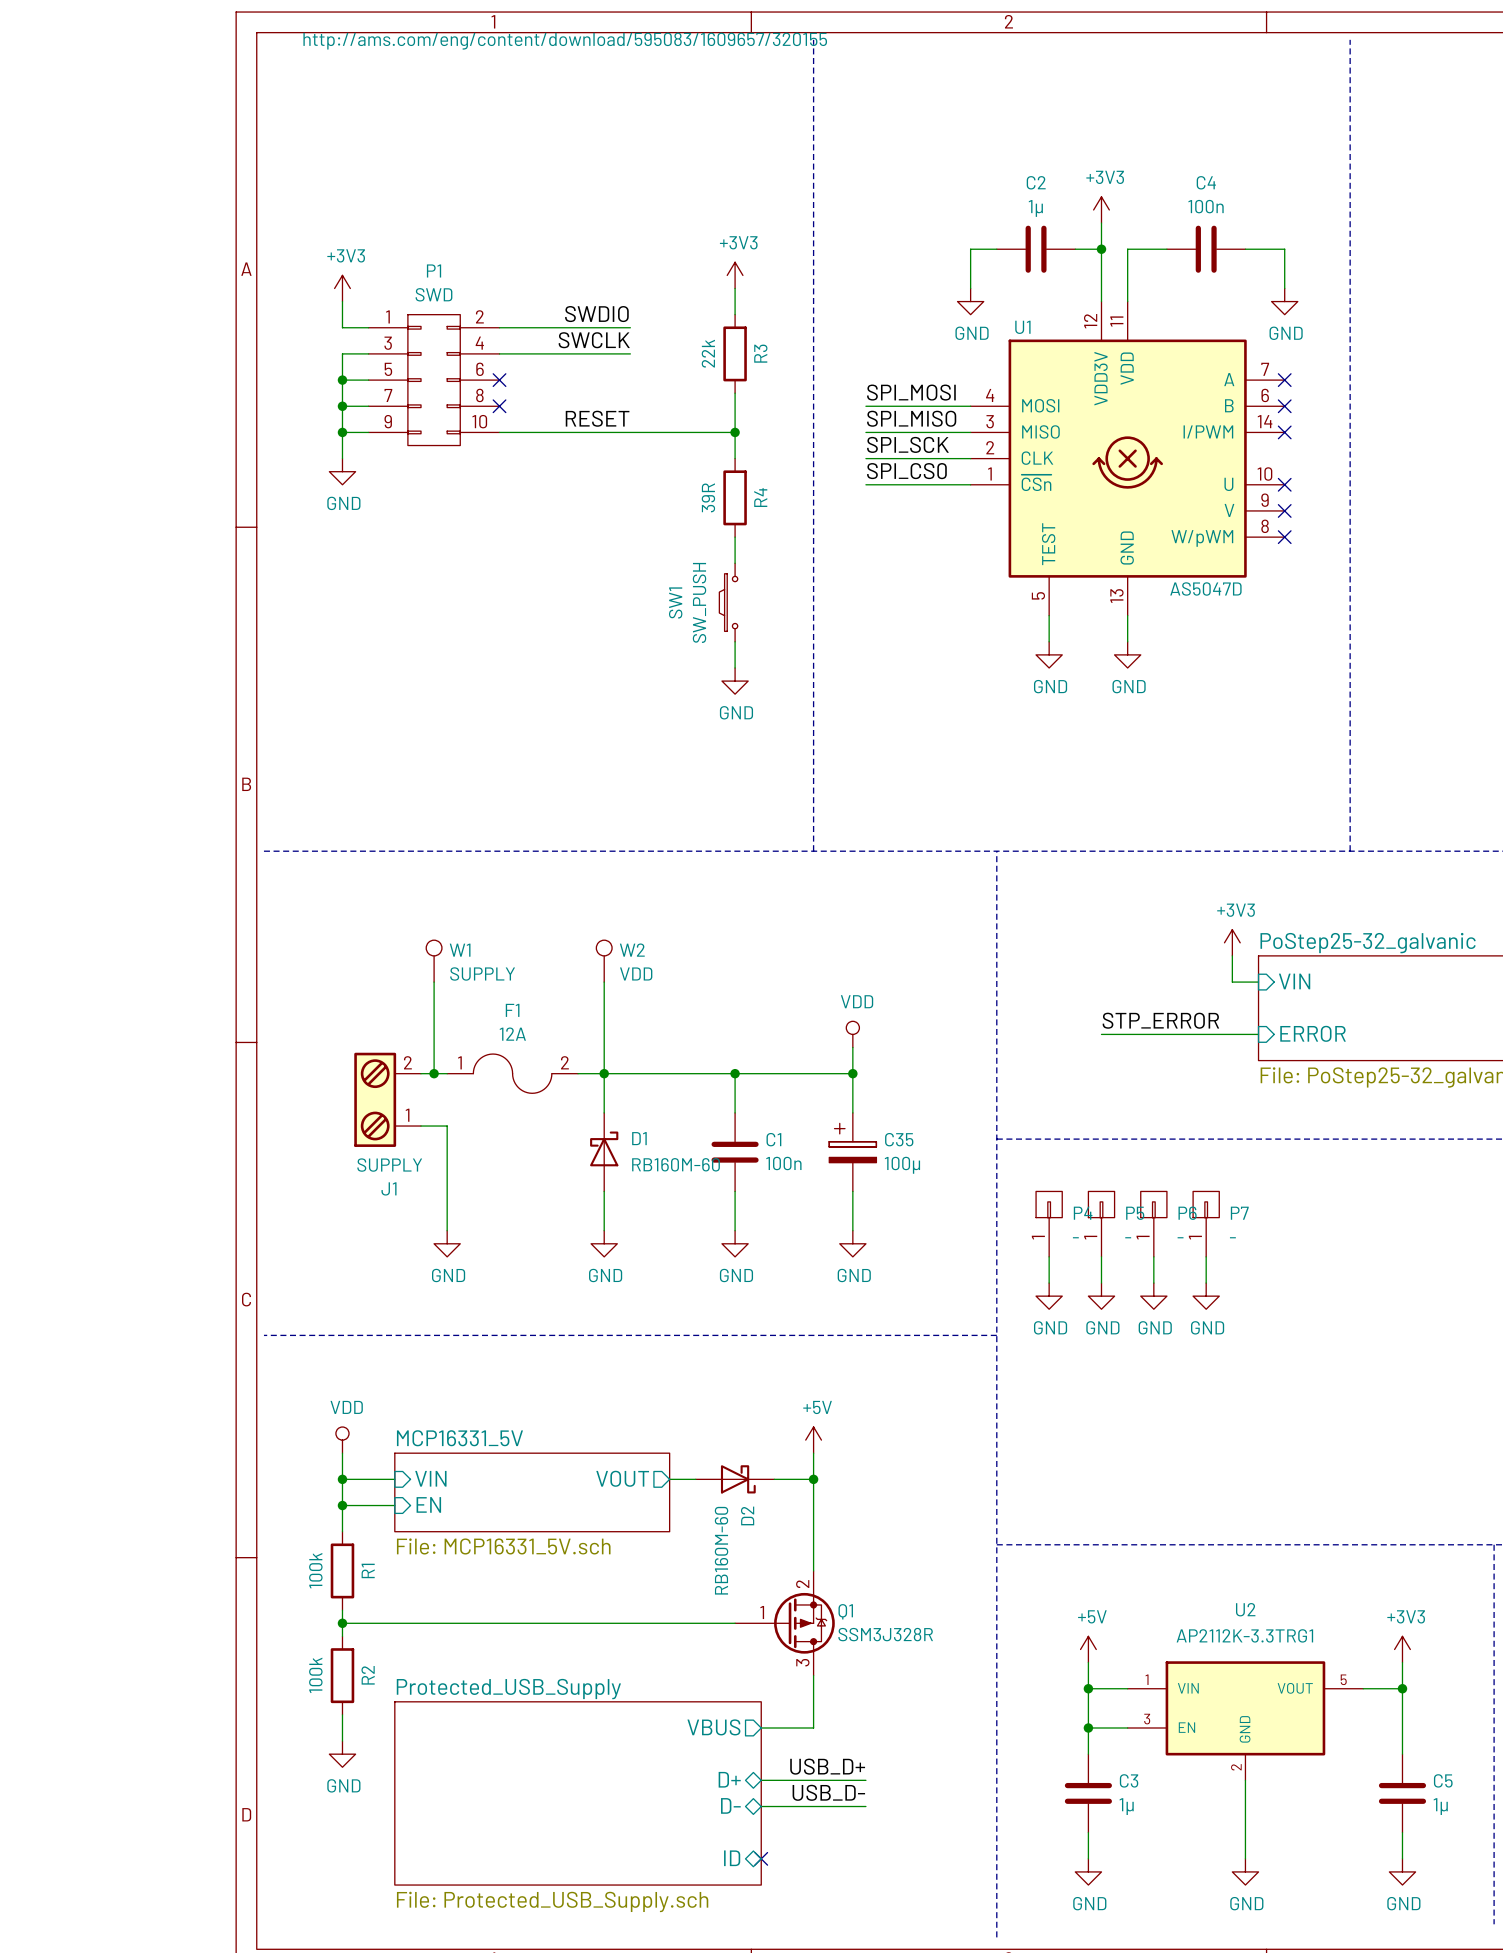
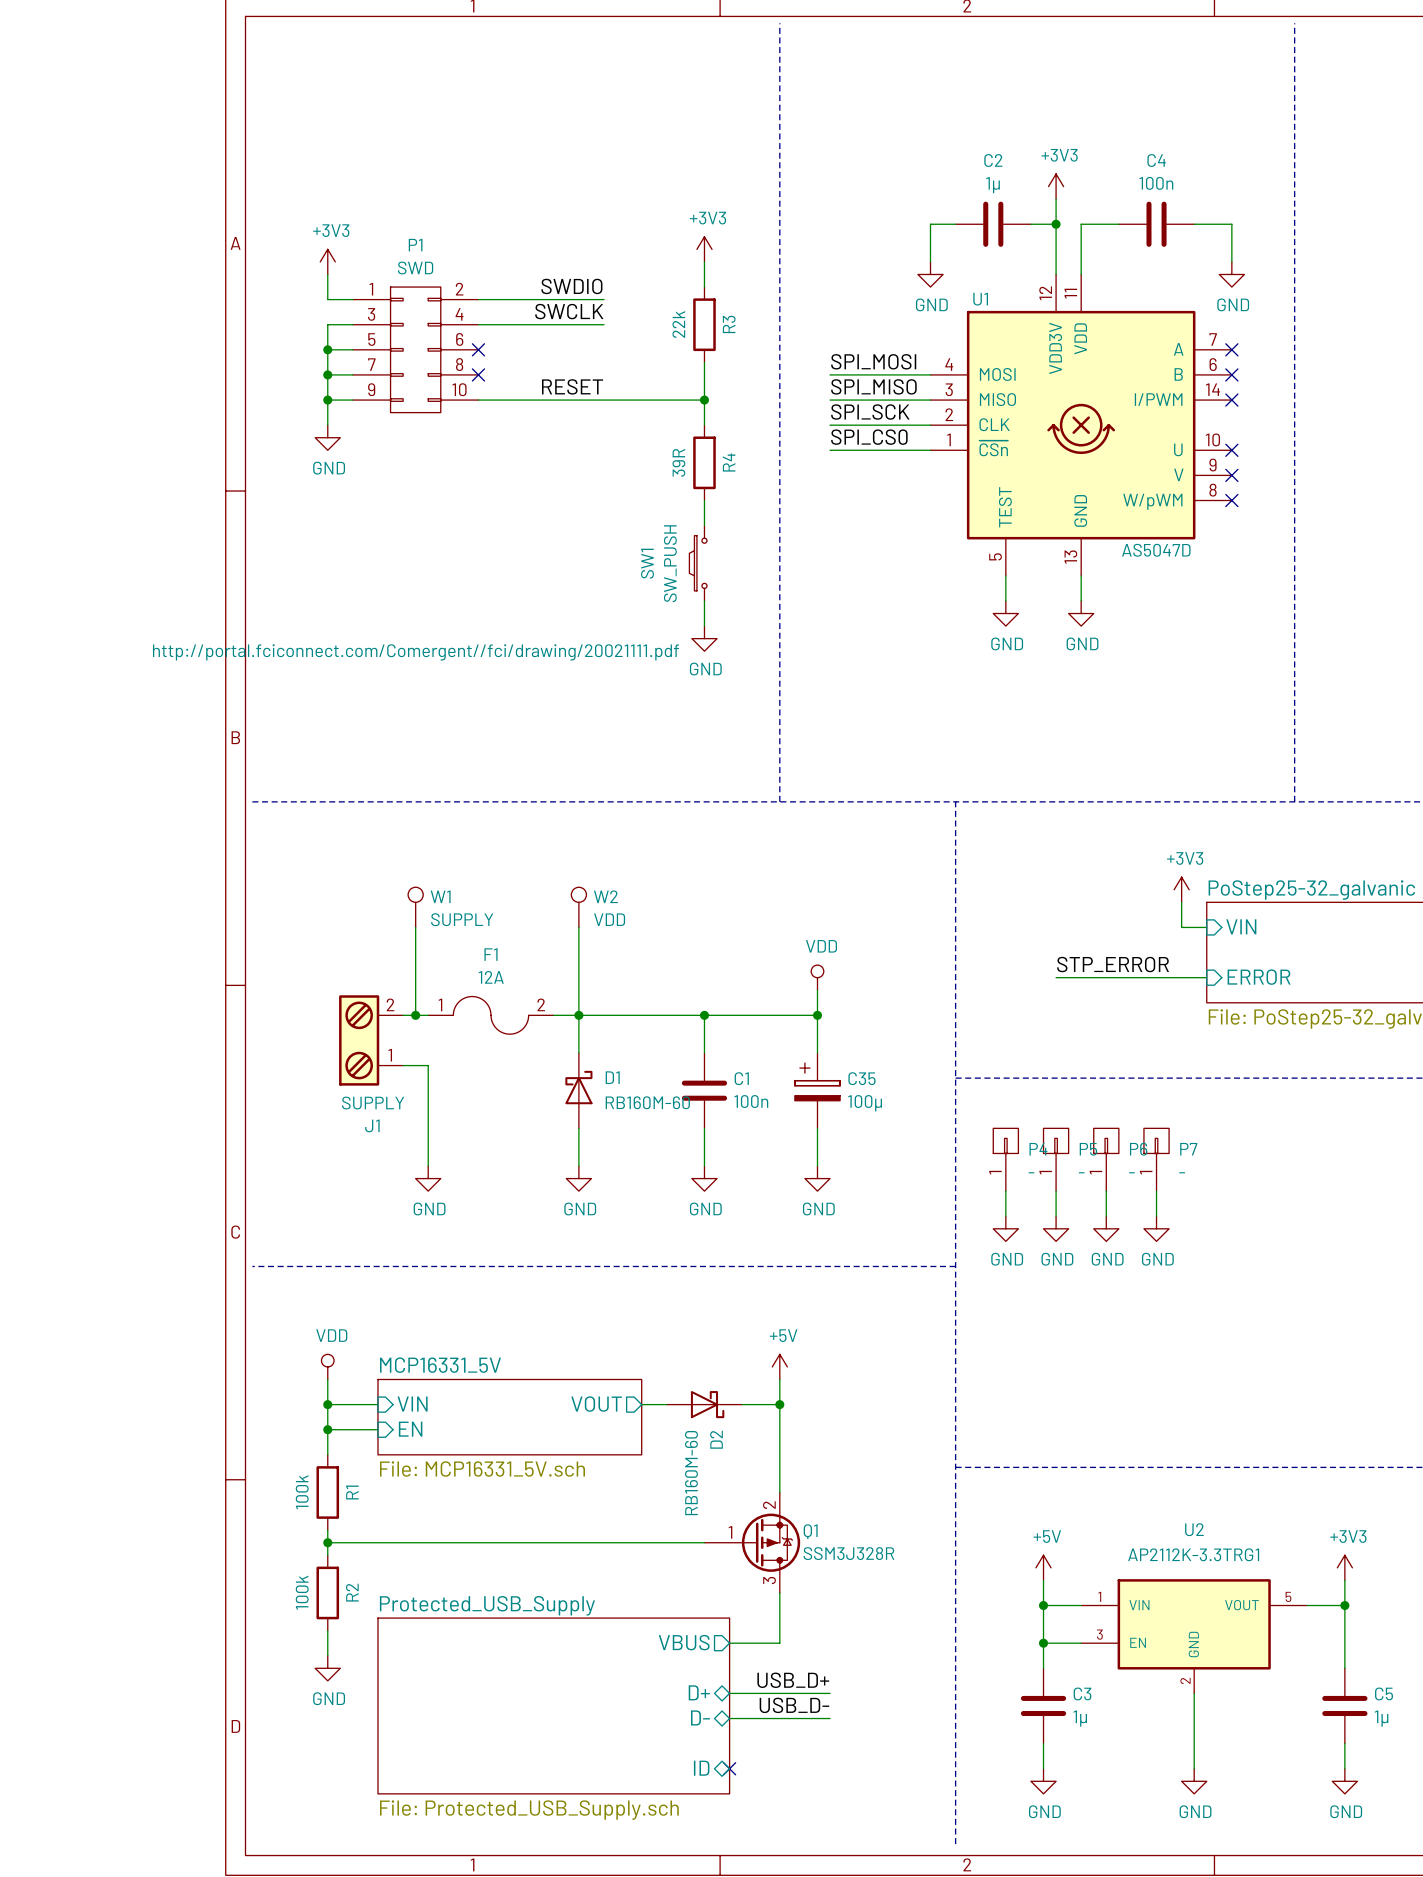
U1 text: http://ams.com/eng/content/download/595083/1609657/320155 (565, 41) -> none
P1 text: none -> http://portal.fciconnect.com/Comergent//fci/drawing/20021111.pdf (415, 652)

